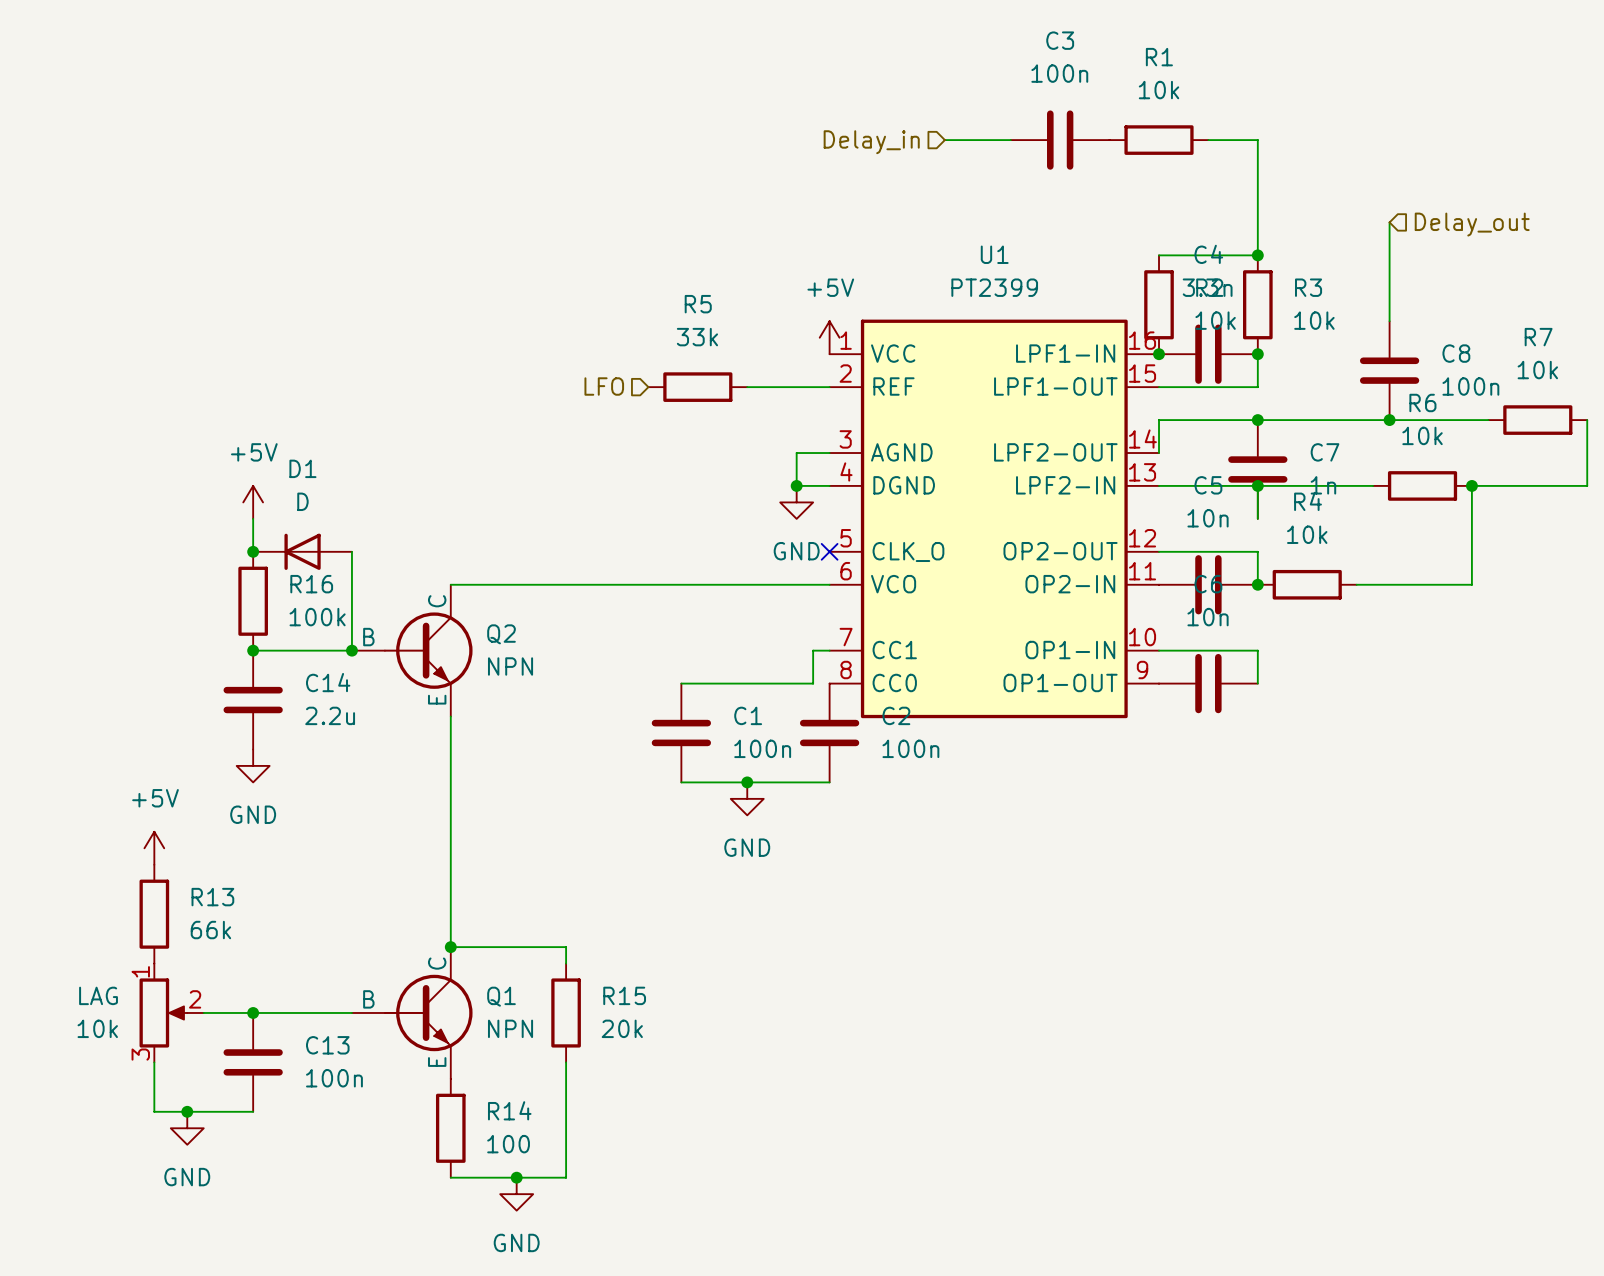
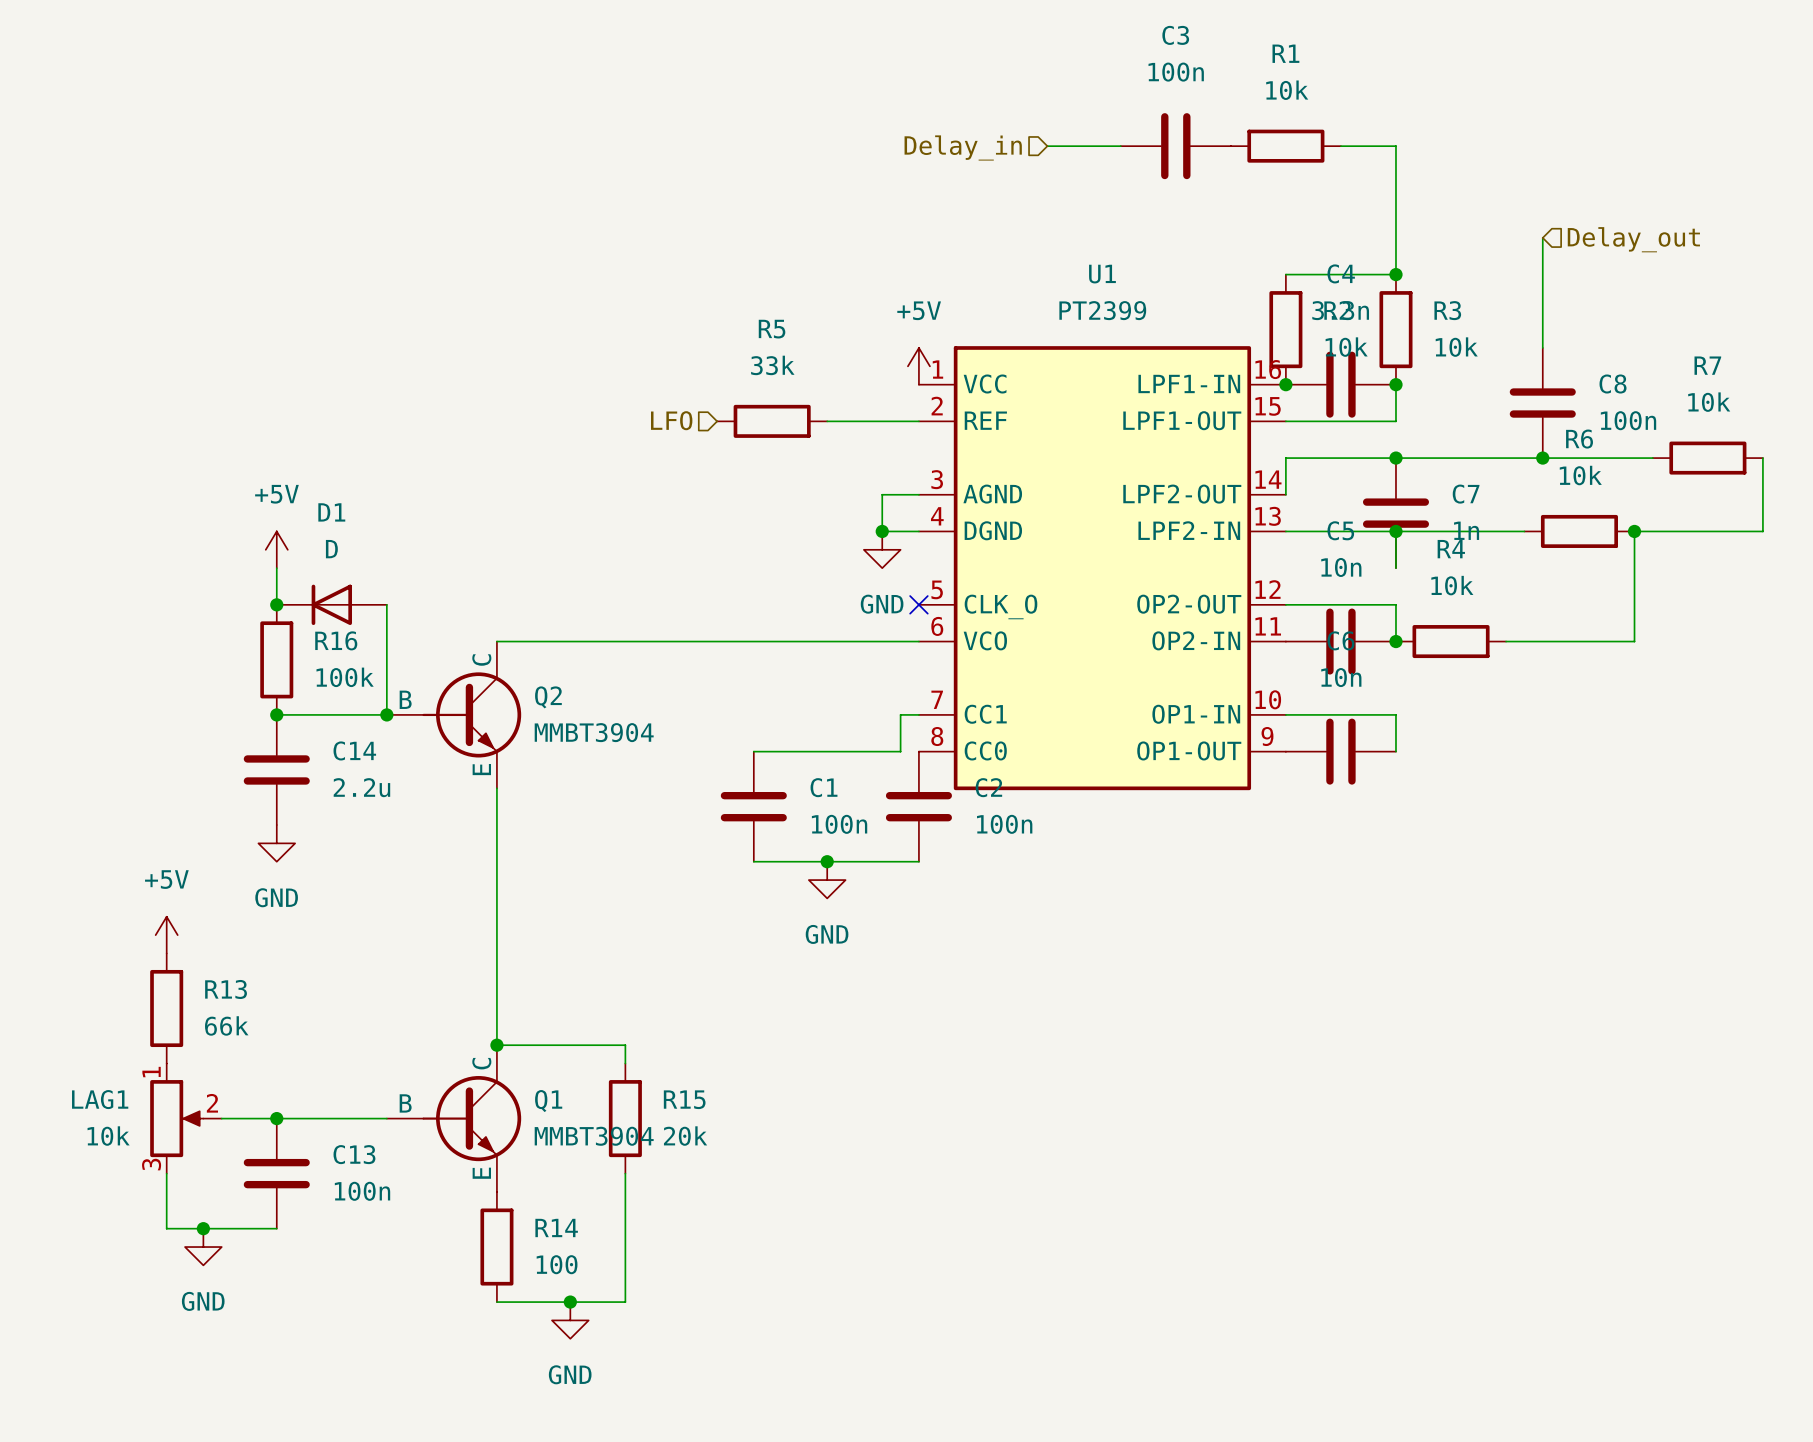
Q2 value: NPN (510, 666) -> MMBT3904 (594, 732)
LAG name: LAG (98, 995) -> LAG1 (100, 1099)
Q1 value: NPN (510, 1028) -> MMBT3904 (594, 1136)

